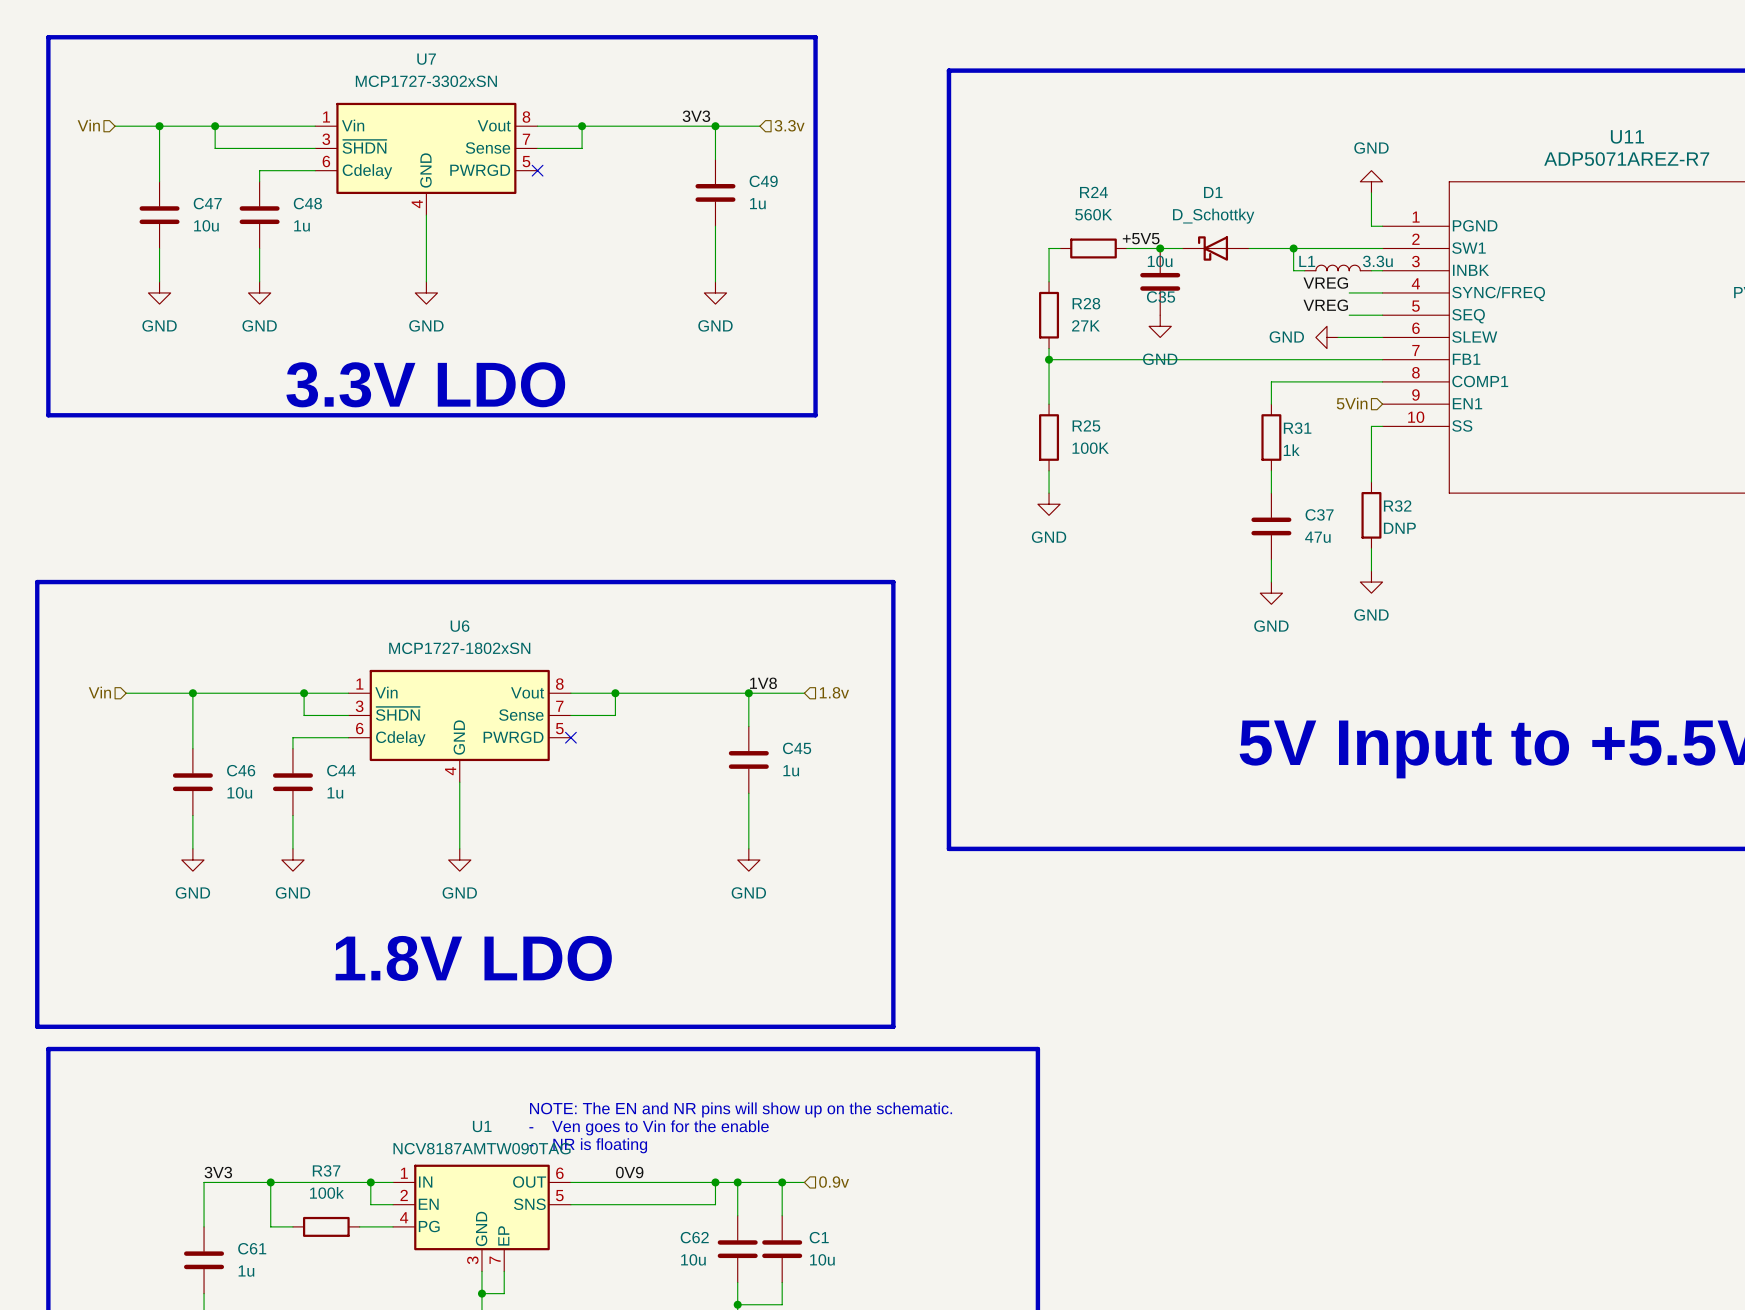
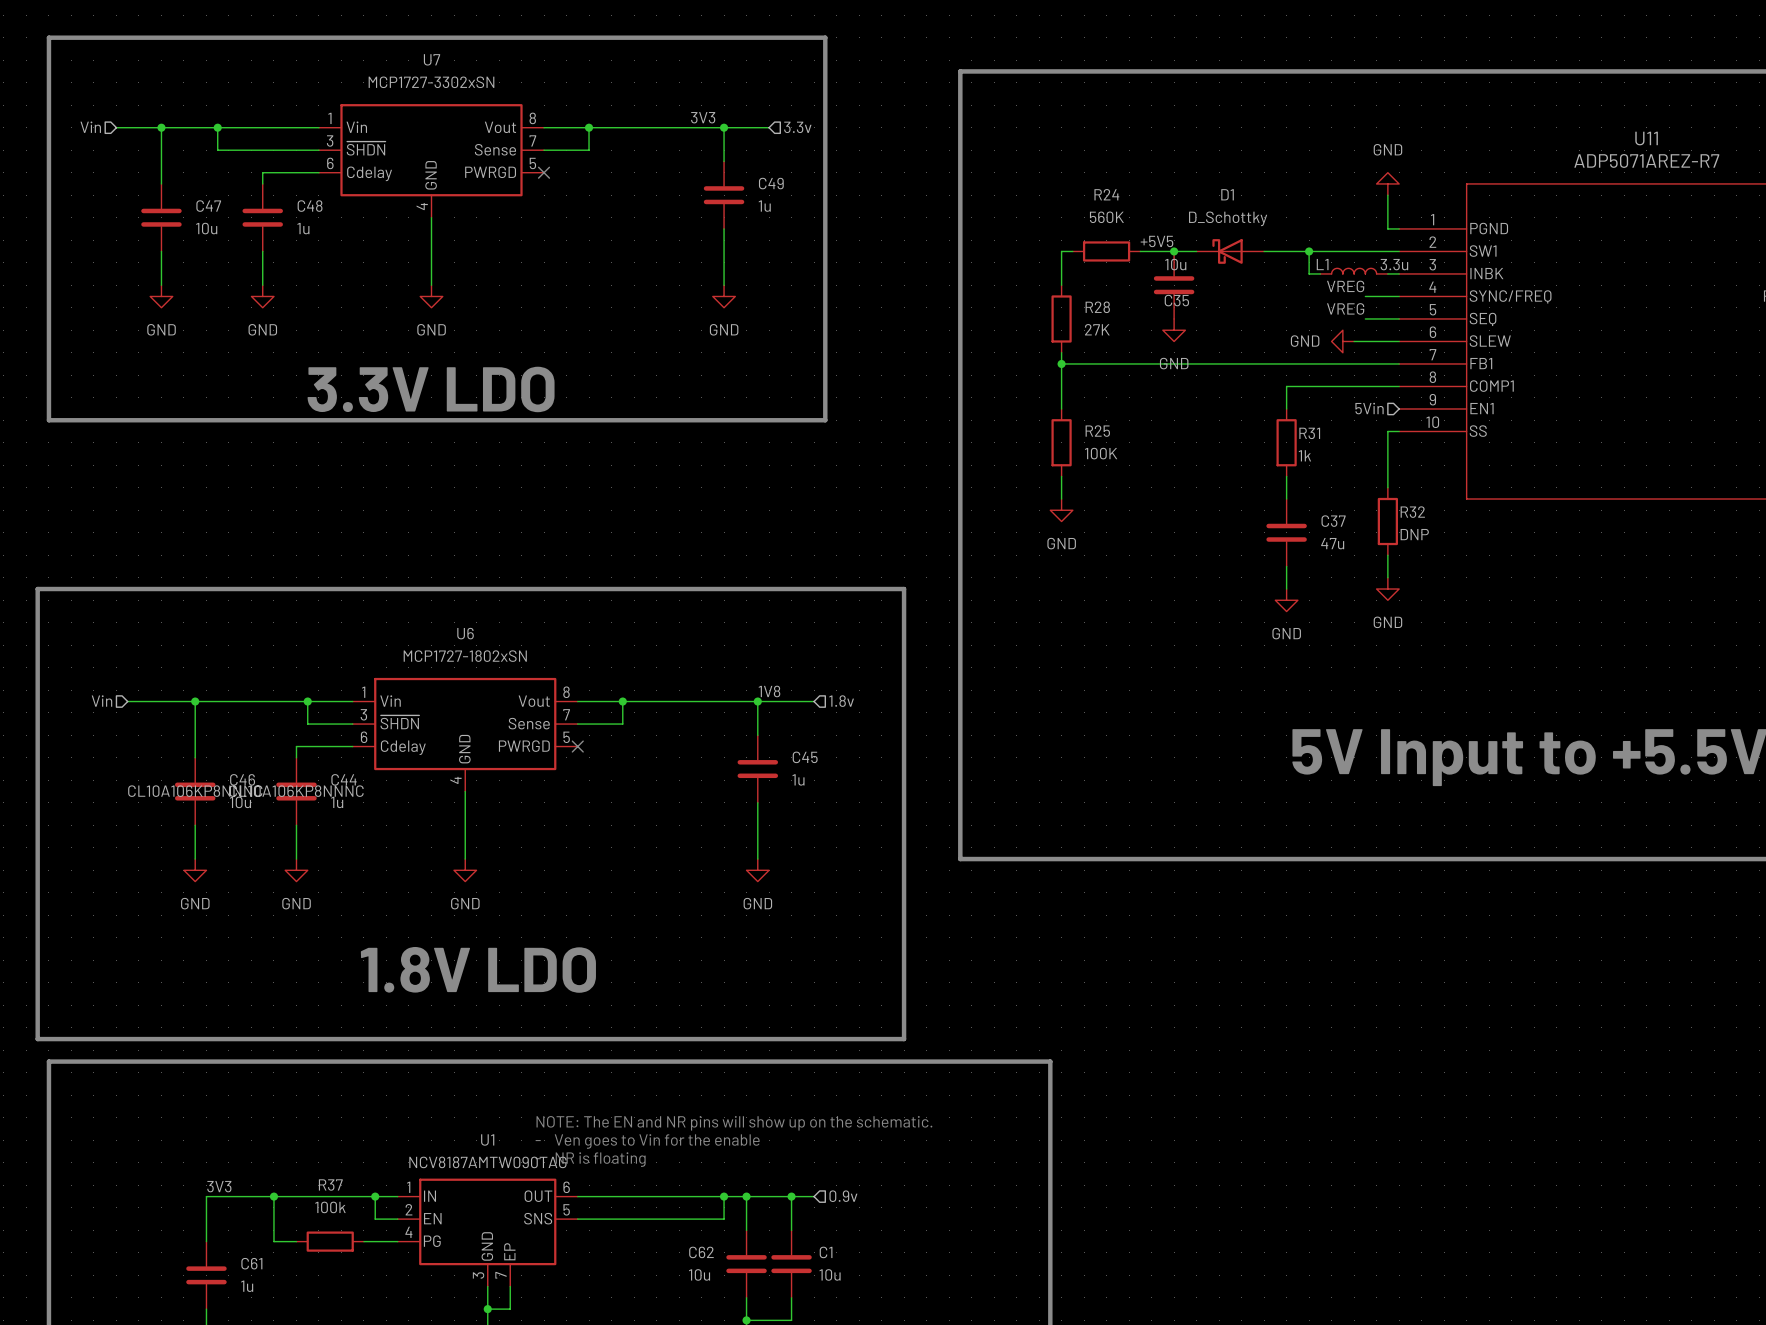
C46 text: none -> CL10A106KP8NNNC (195, 791)
C44 text: none -> CL10A106KP8NNNC (296, 791)
label: 0V9 (629, 1172) -> none

